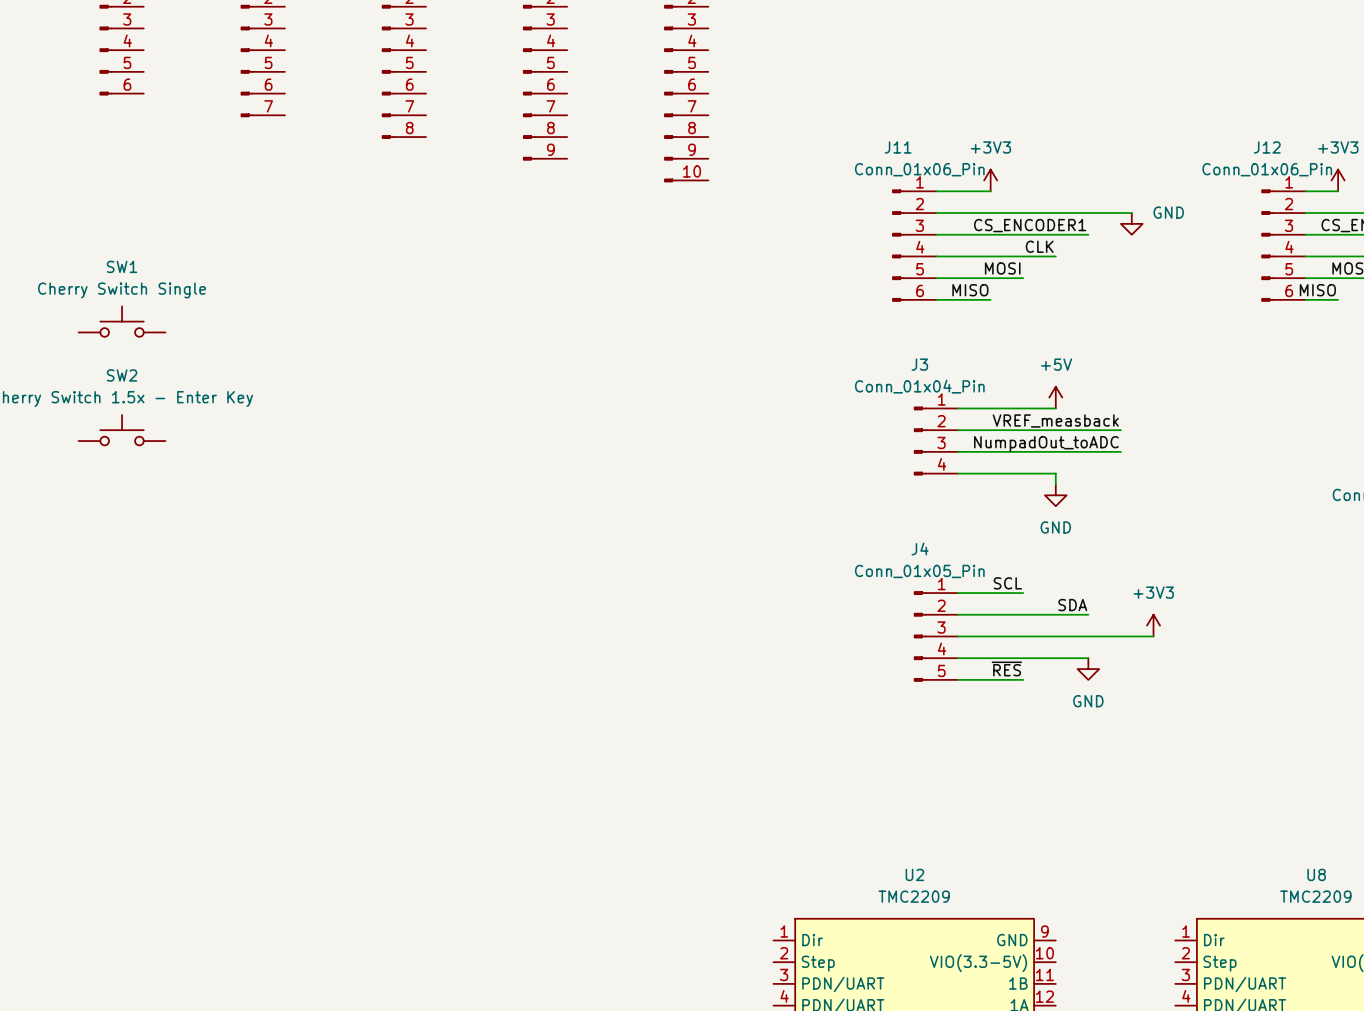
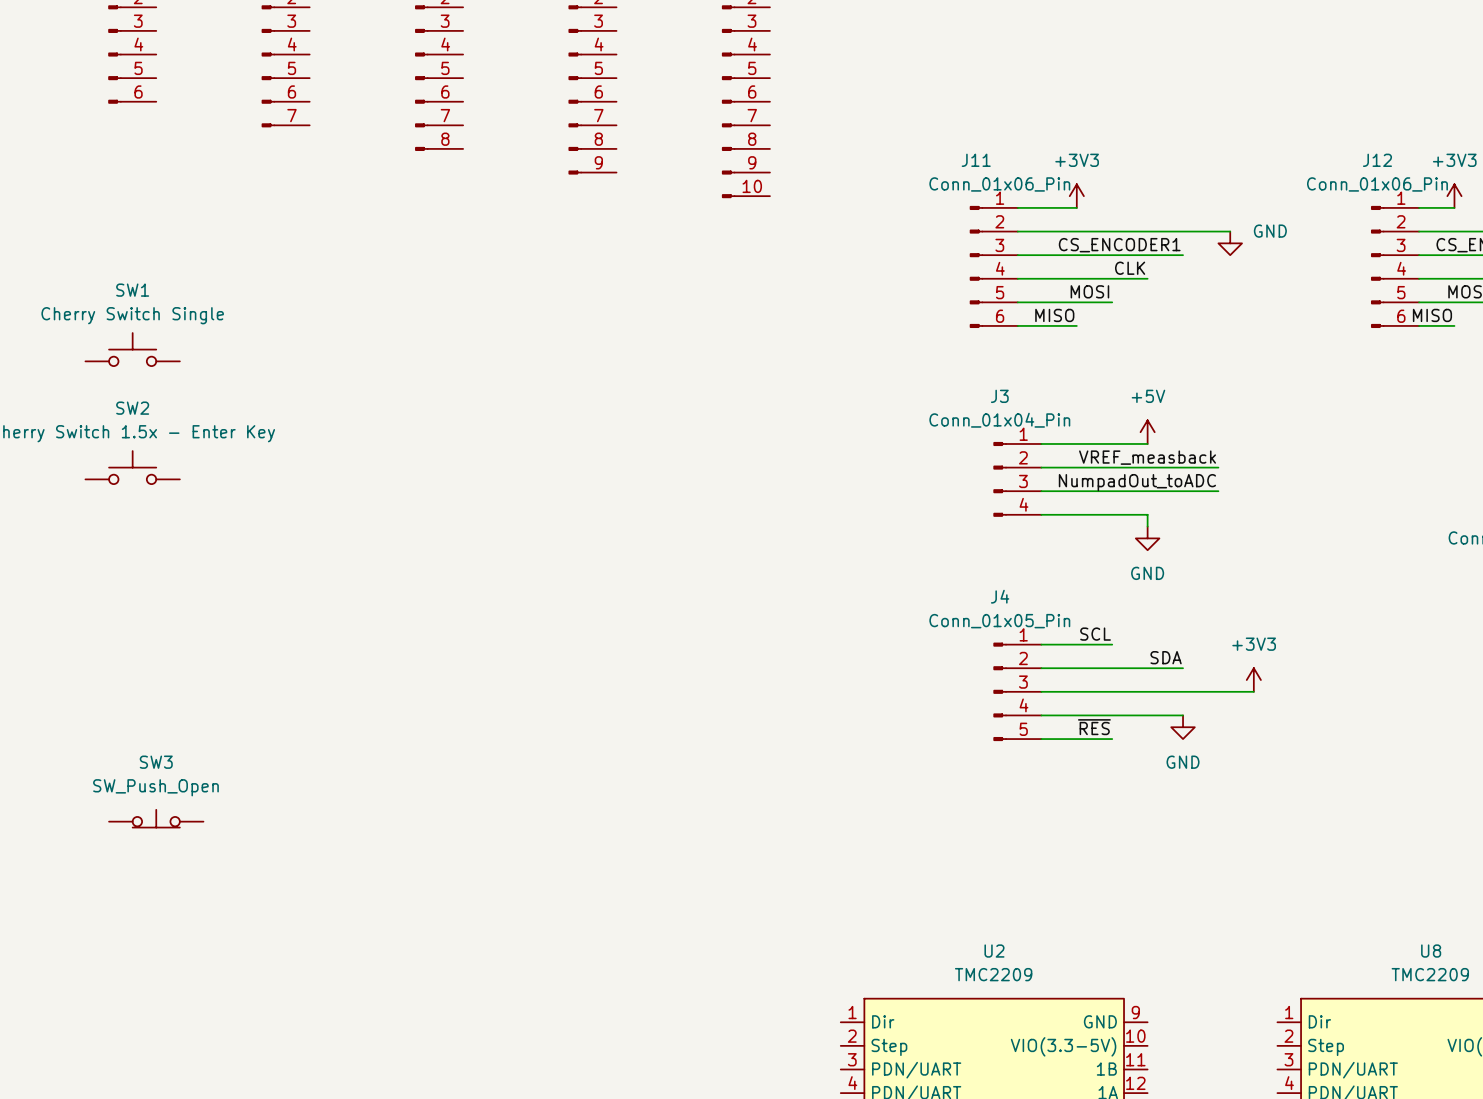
SW3: none -> SW_Push_Open (156, 818)

